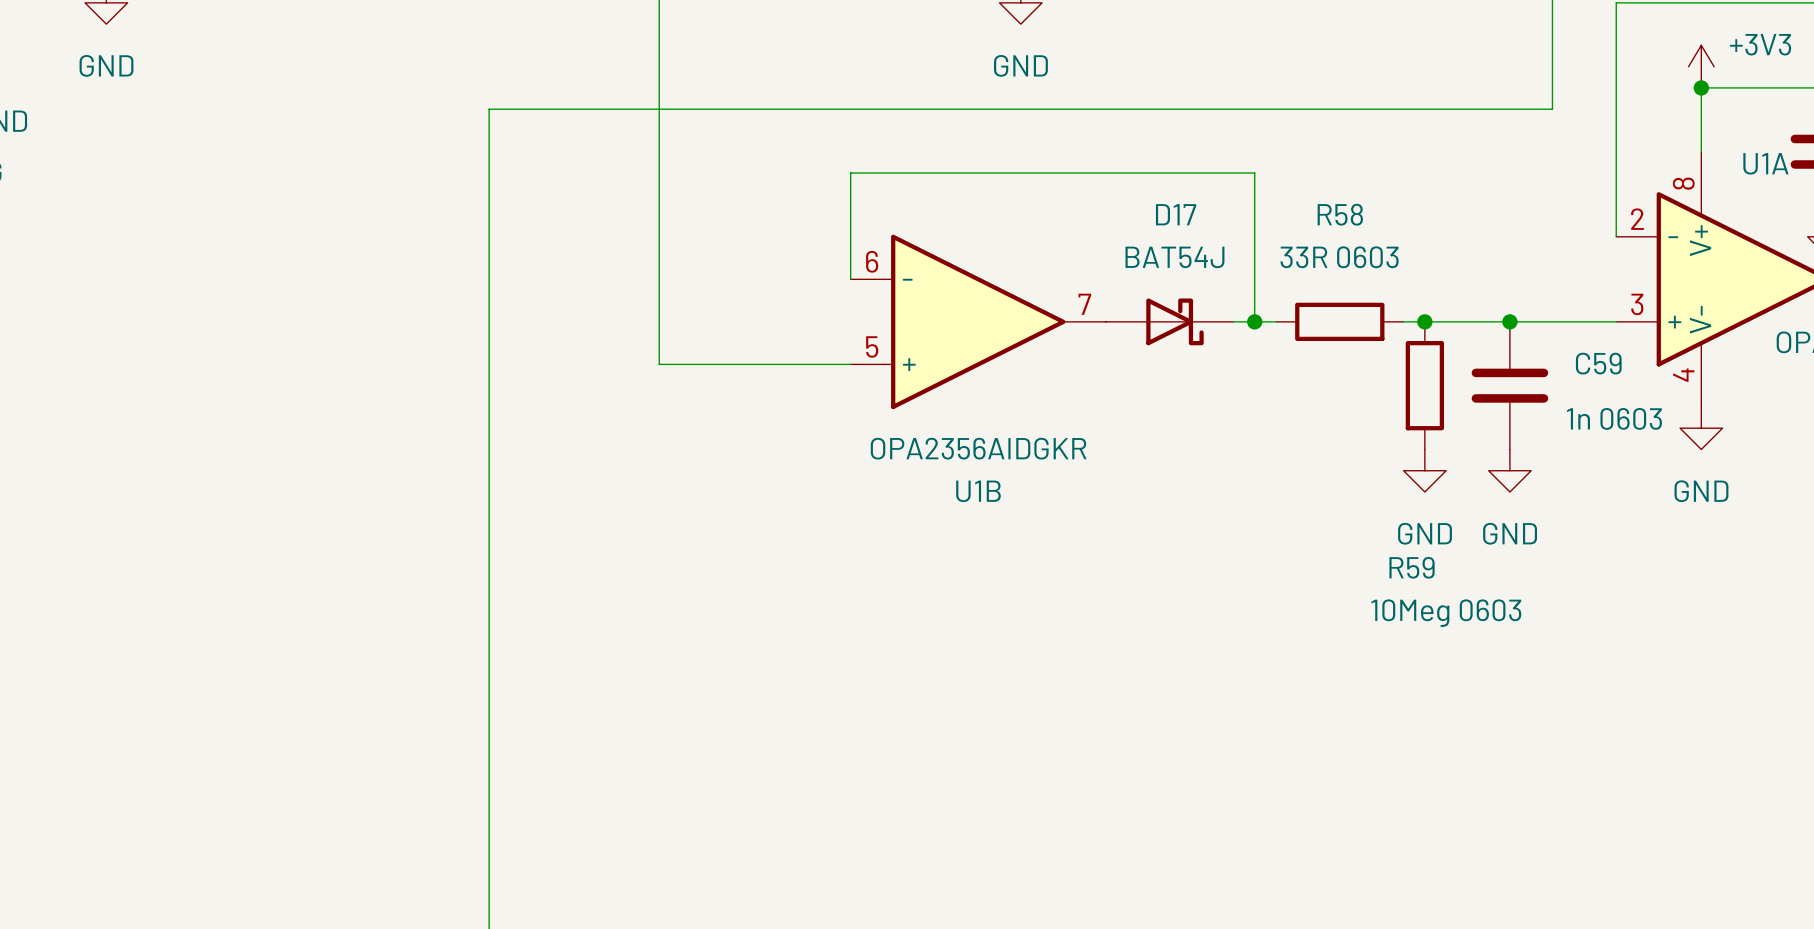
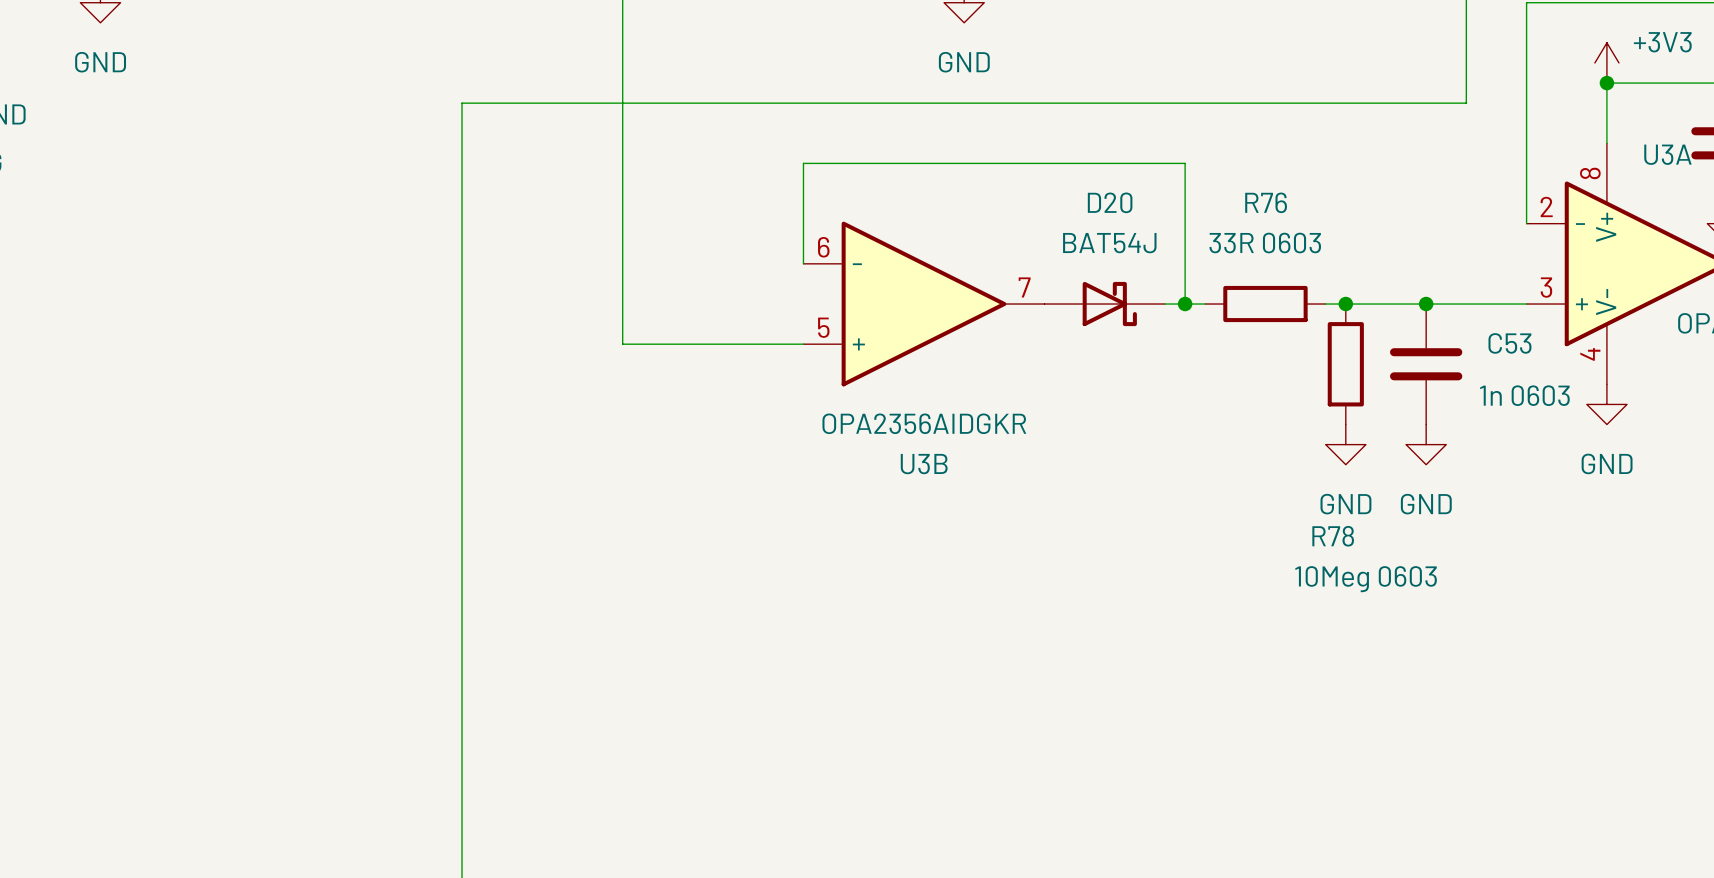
U1A name: U1A (1765, 163) -> U3A (1667, 154)
D17 name: D17 (1176, 214) -> D20 (1110, 202)
R58 name: R58 (1340, 214) -> R76 (1266, 202)
C59 name: C59 (1598, 363) -> C53 (1509, 343)
U1B name: U1B (978, 491) -> U3B (924, 464)
R59 name: R59 (1412, 567) -> R78 (1333, 536)

